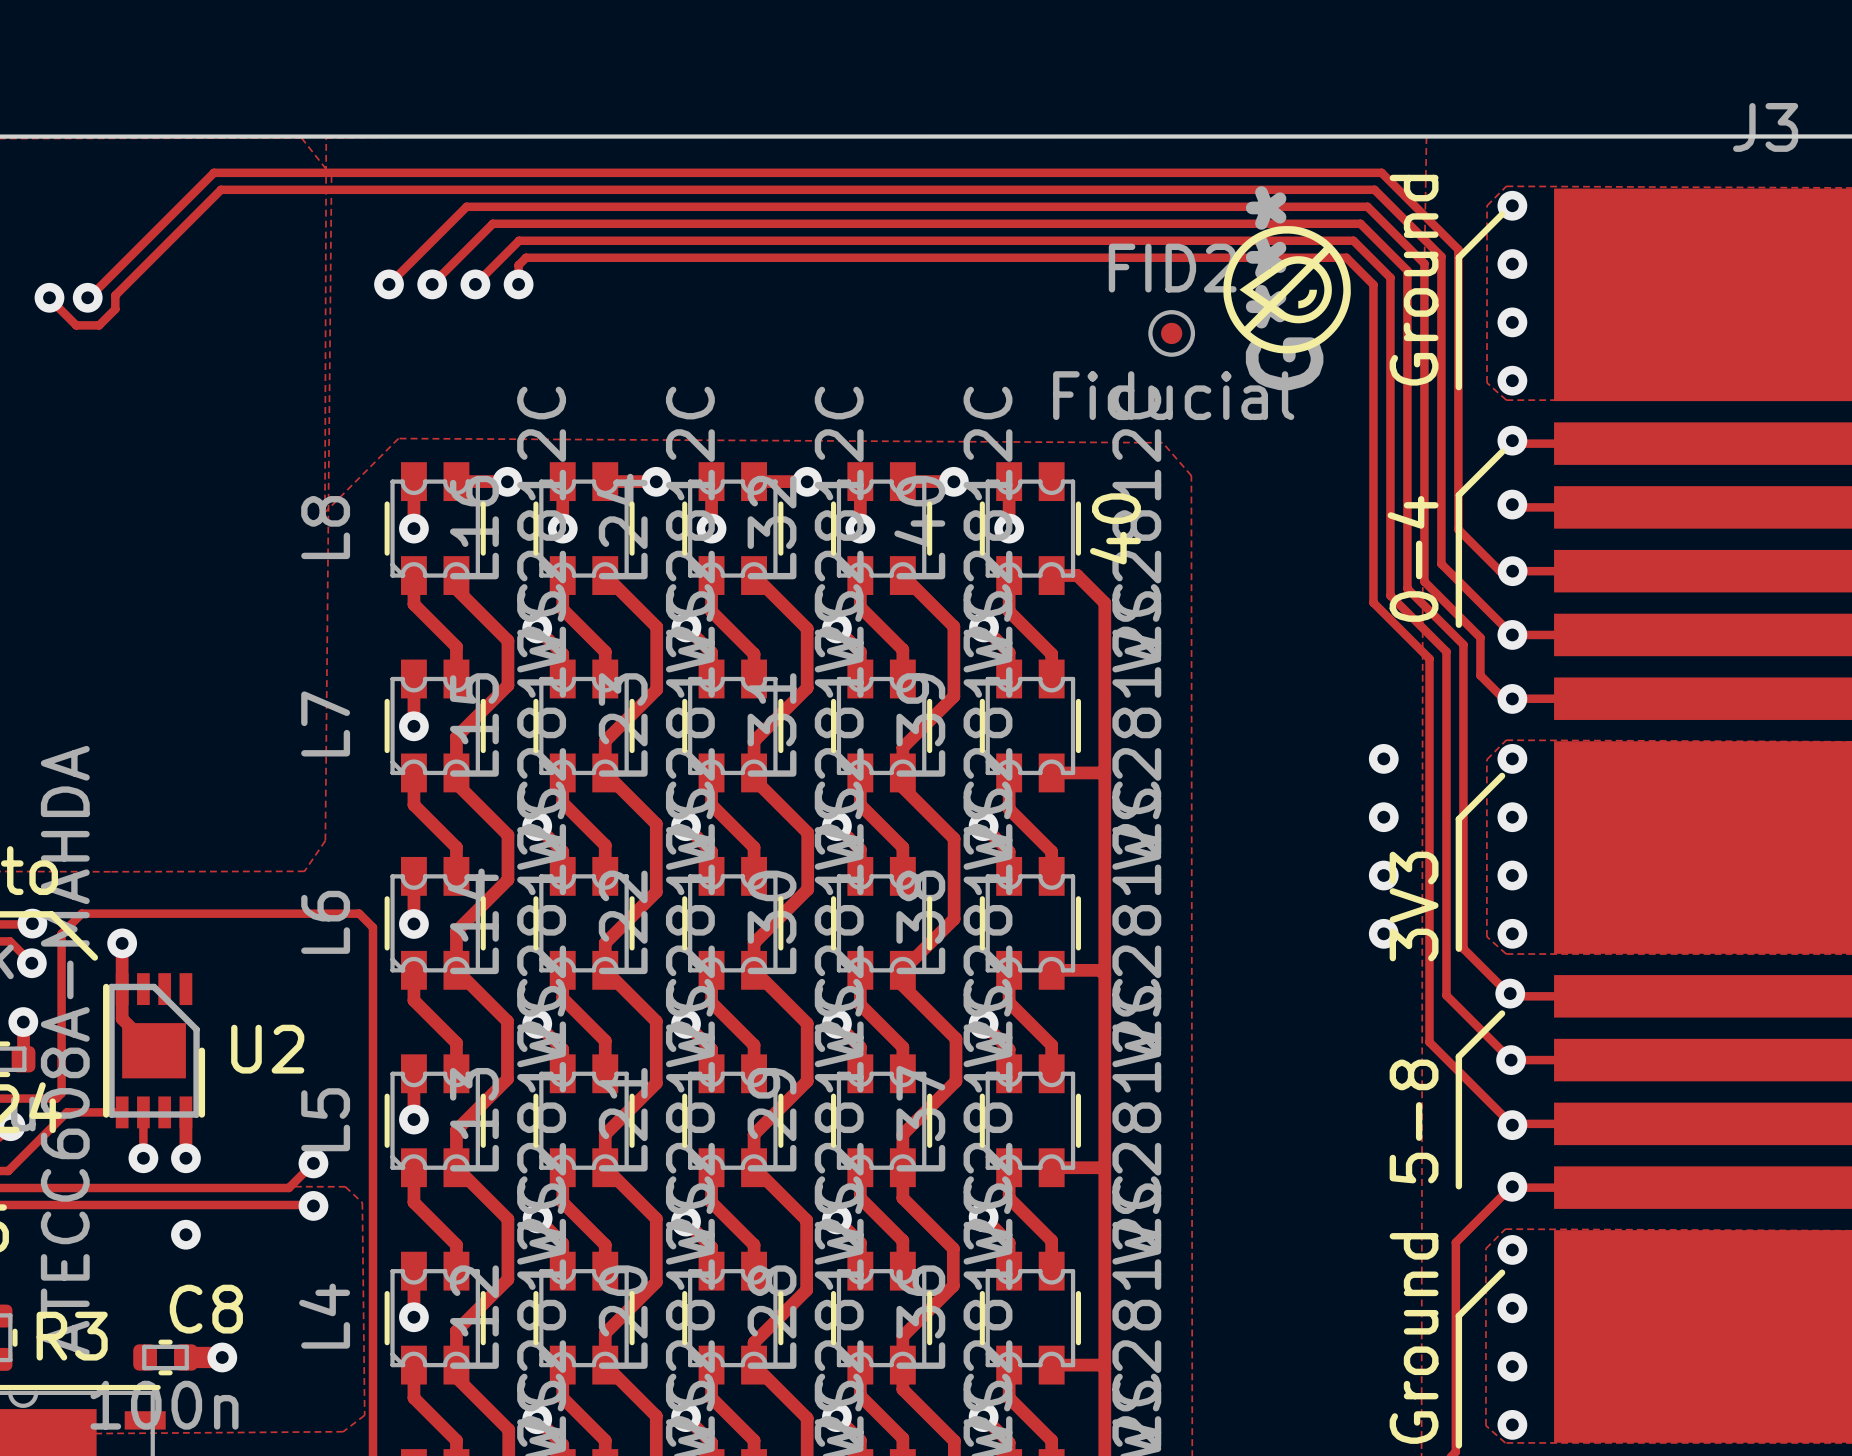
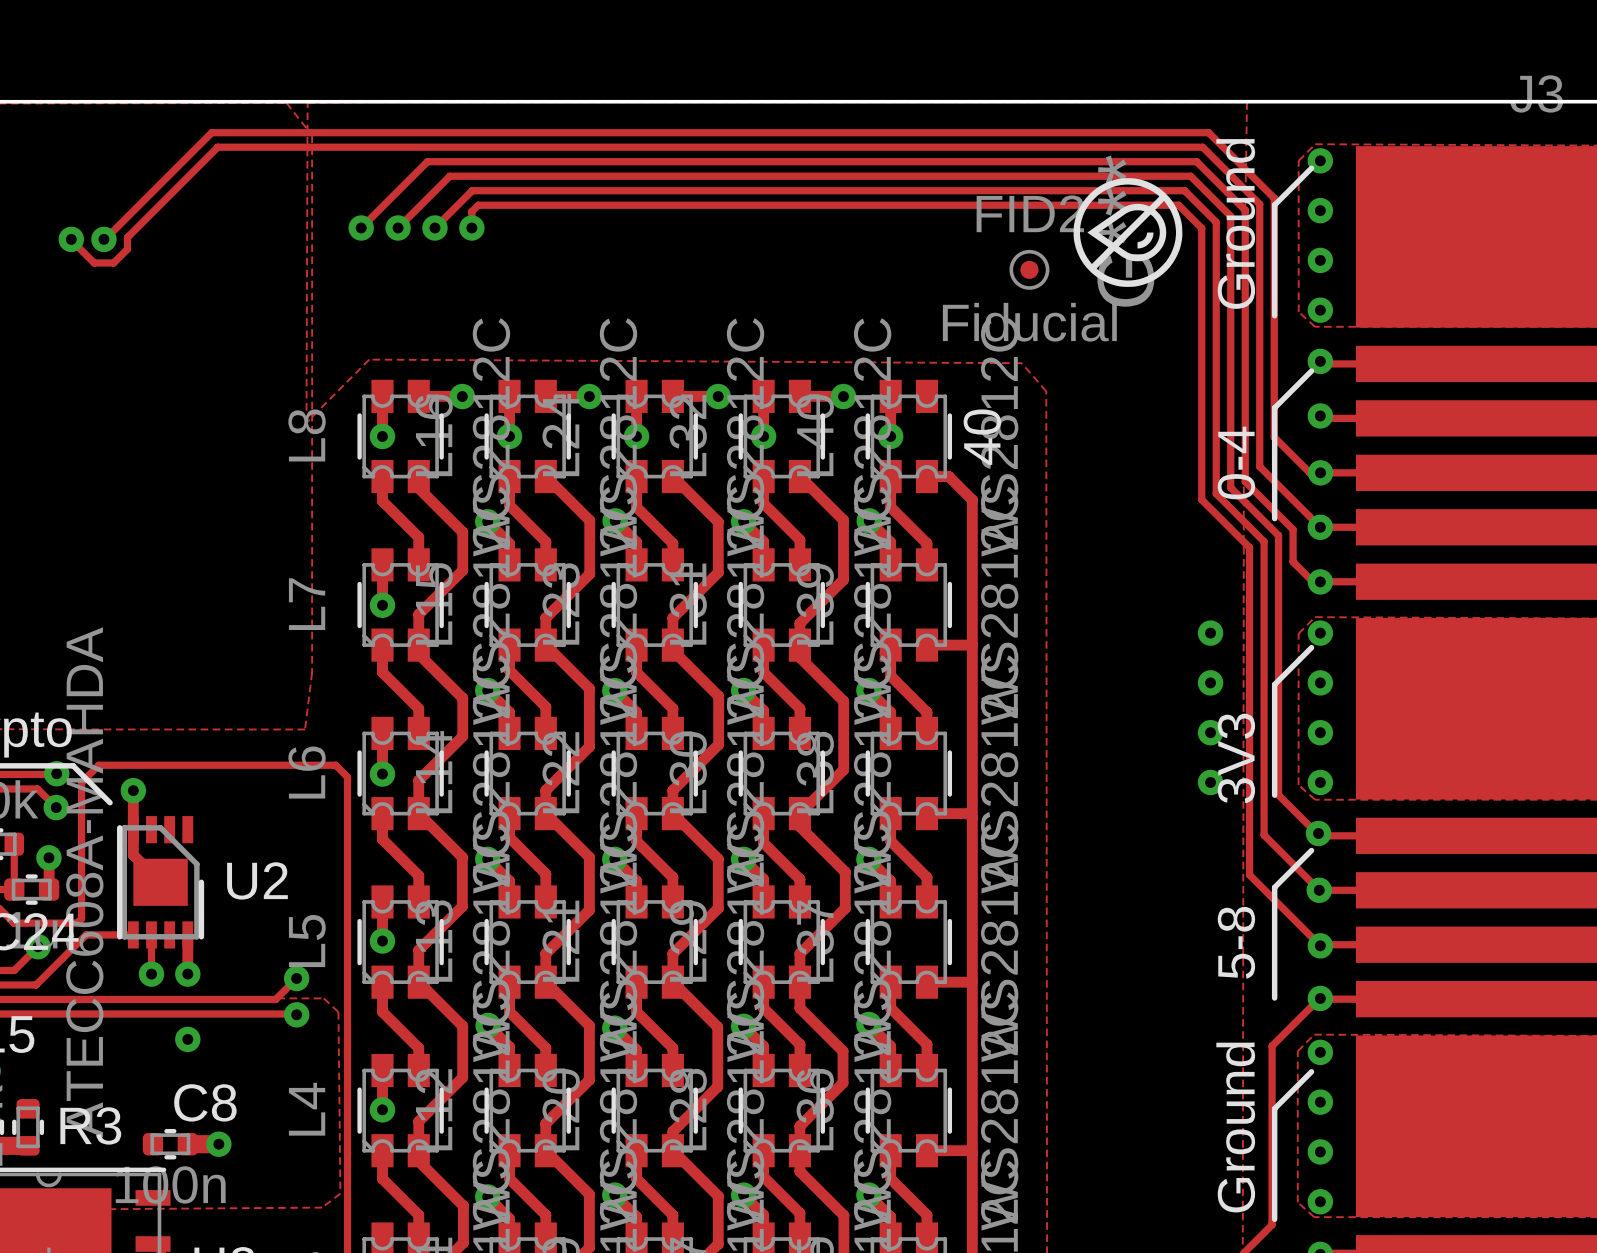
zone outline: (331, 176) (325, 840) (304, 871) (110, 871) -> (312, 135) (312, 672) (305, 729) (123, 729)

